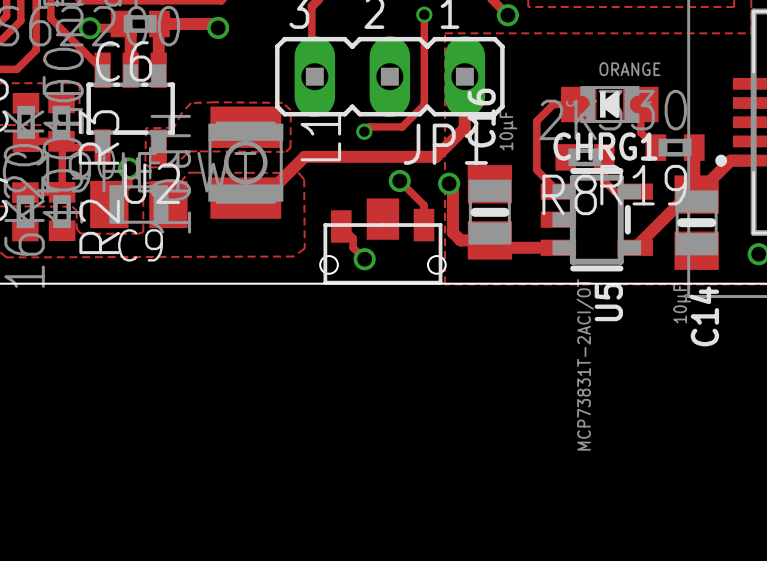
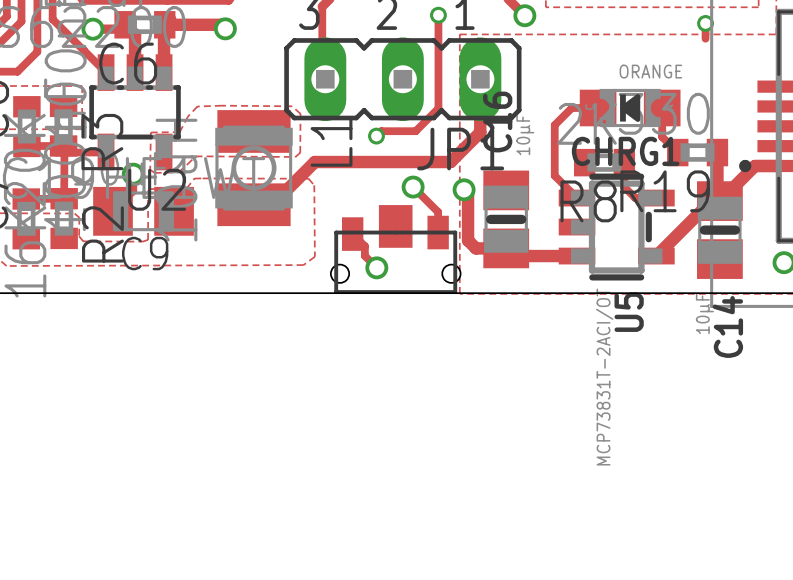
track: none -> (705, 23) (705, 38)
via: none -> (705, 23)

